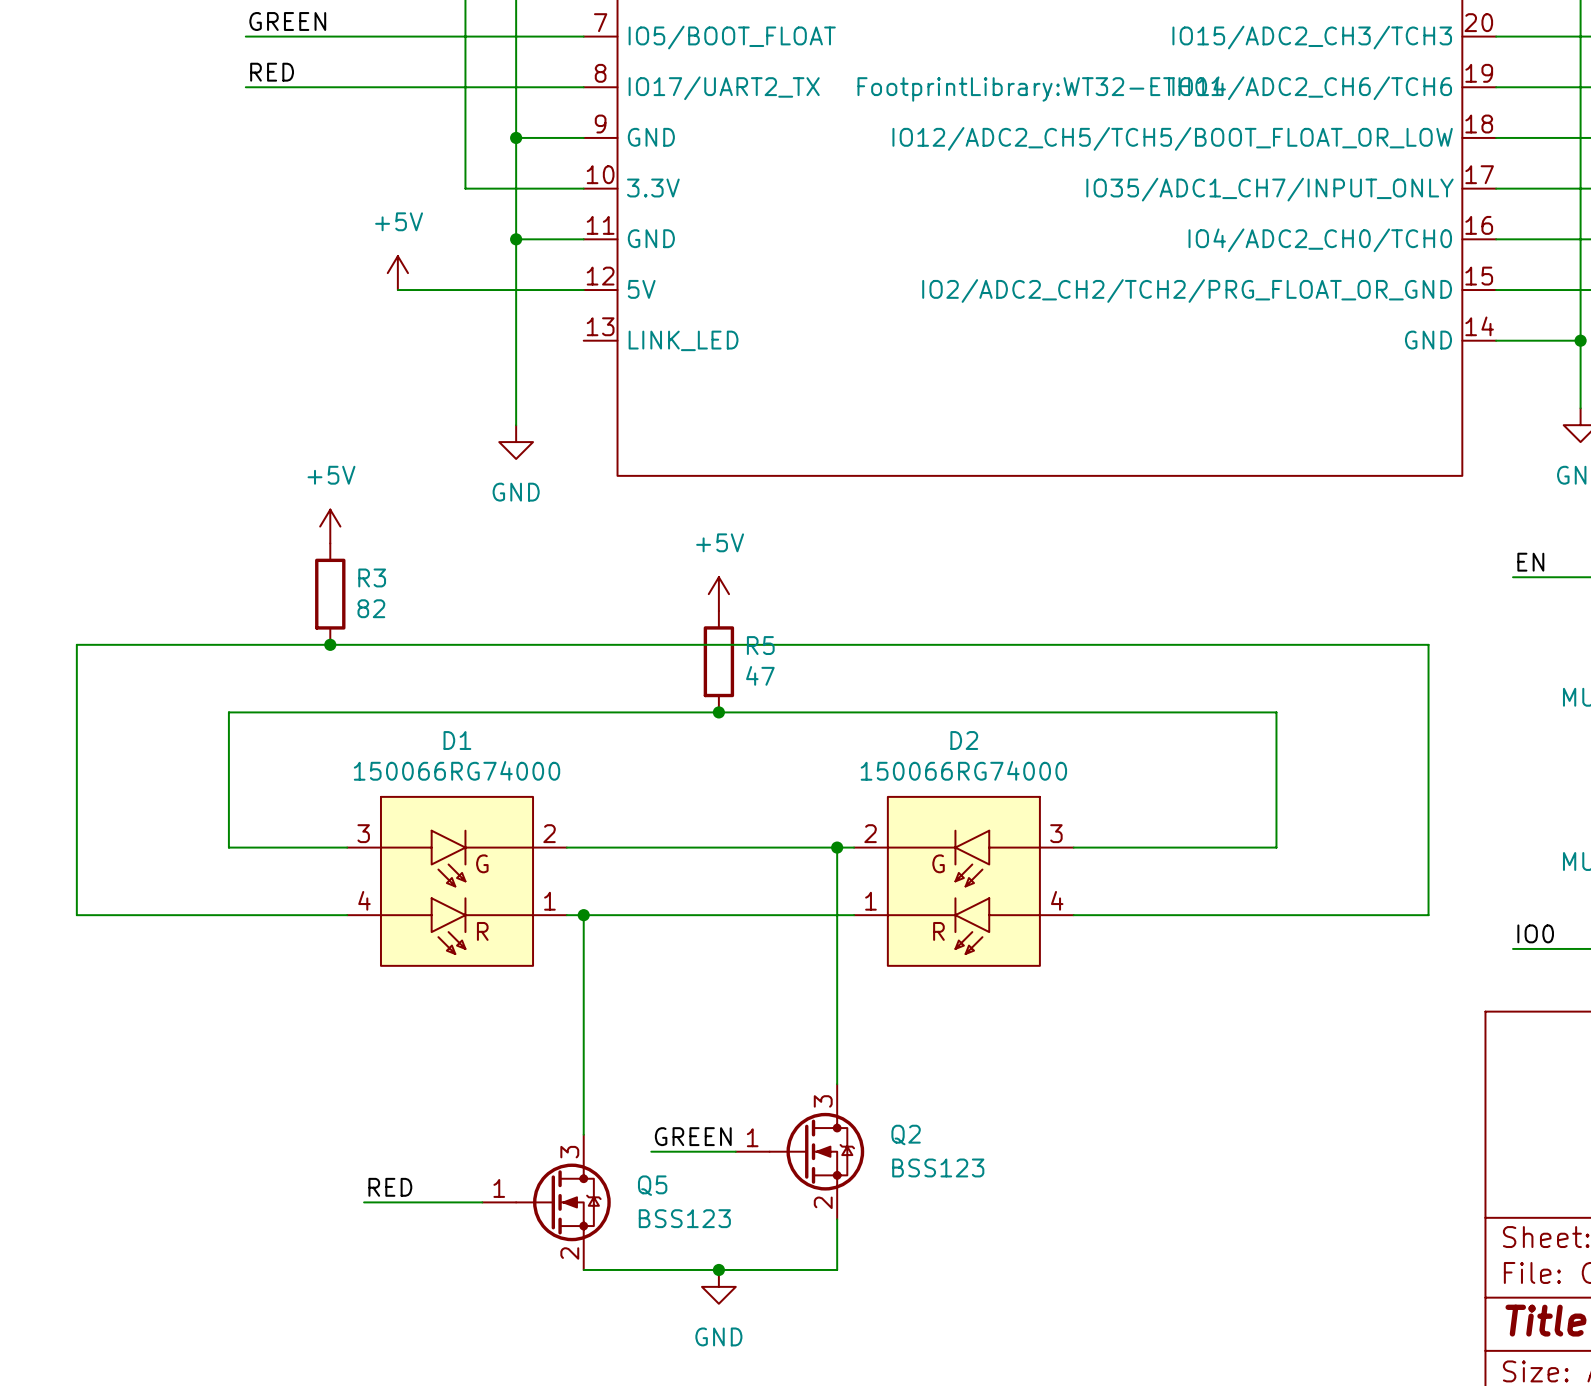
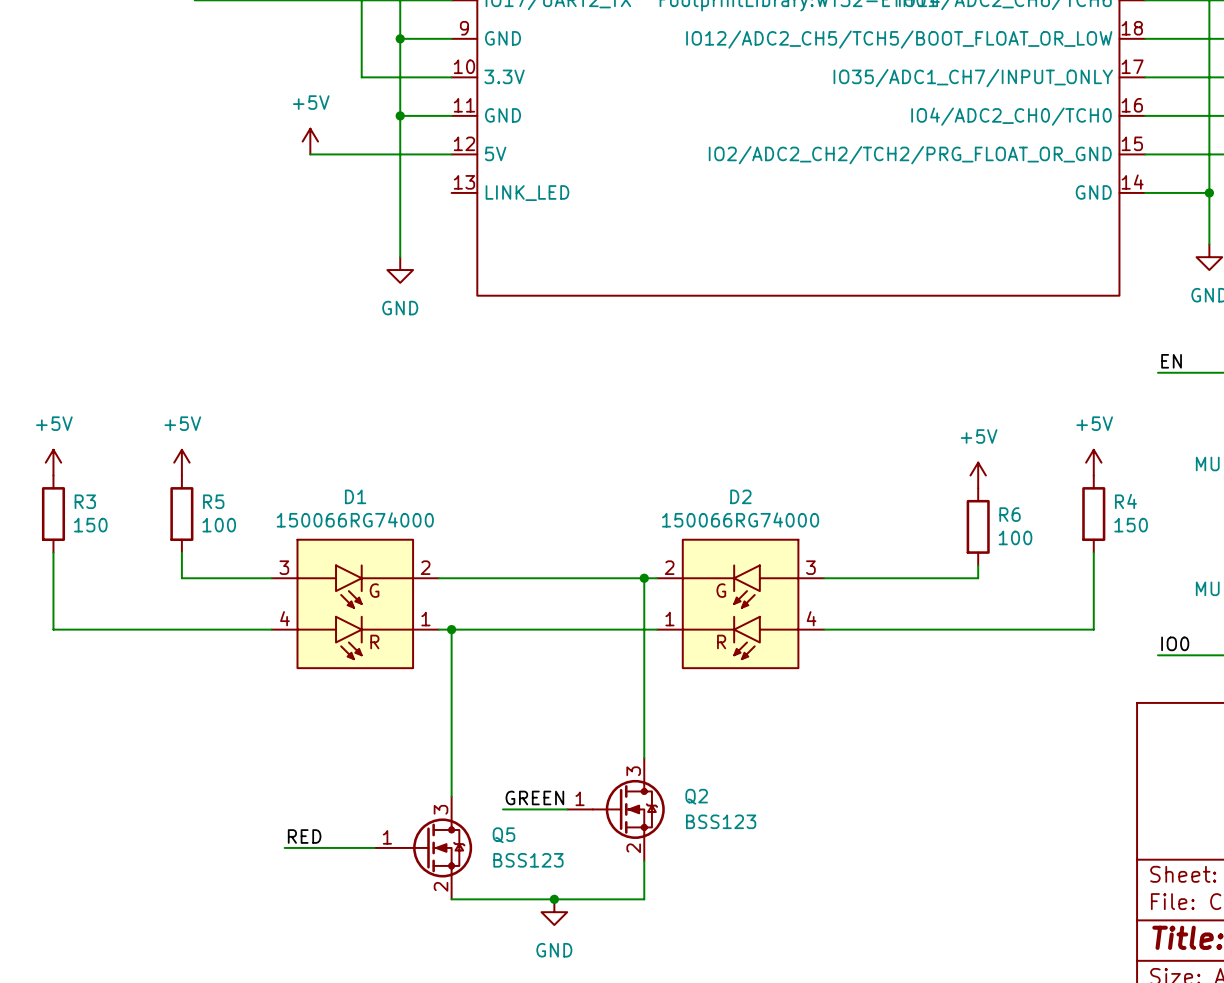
power symbol: +5V (330, 526) -> none
R3 position: (330, 594) -> (53, 514)
power symbol: +5V (718, 594) -> none
R3 value: 82 (371, 608) -> 150 (90, 525)
junction: (330, 644) -> none
R5 position: (718, 661) -> (181, 514)
R5 value: 47 (760, 675) -> 100 (219, 525)
power symbol: none -> +5V (53, 462)
power symbol: none -> +5V (181, 462)
power symbol: none -> +5V (1093, 462)
junction: (718, 712) -> none
power symbol: none -> +5V (978, 475)
R4: none -> 150 (1093, 514)
R6: none -> 100 (978, 526)
wire: (228, 813) (228, 712) (1276, 712) (1276, 830) -> none
wire: (1428, 813) (1428, 644) (76, 644) (76, 915) -> (53, 552) (53, 629) (66, 629)

